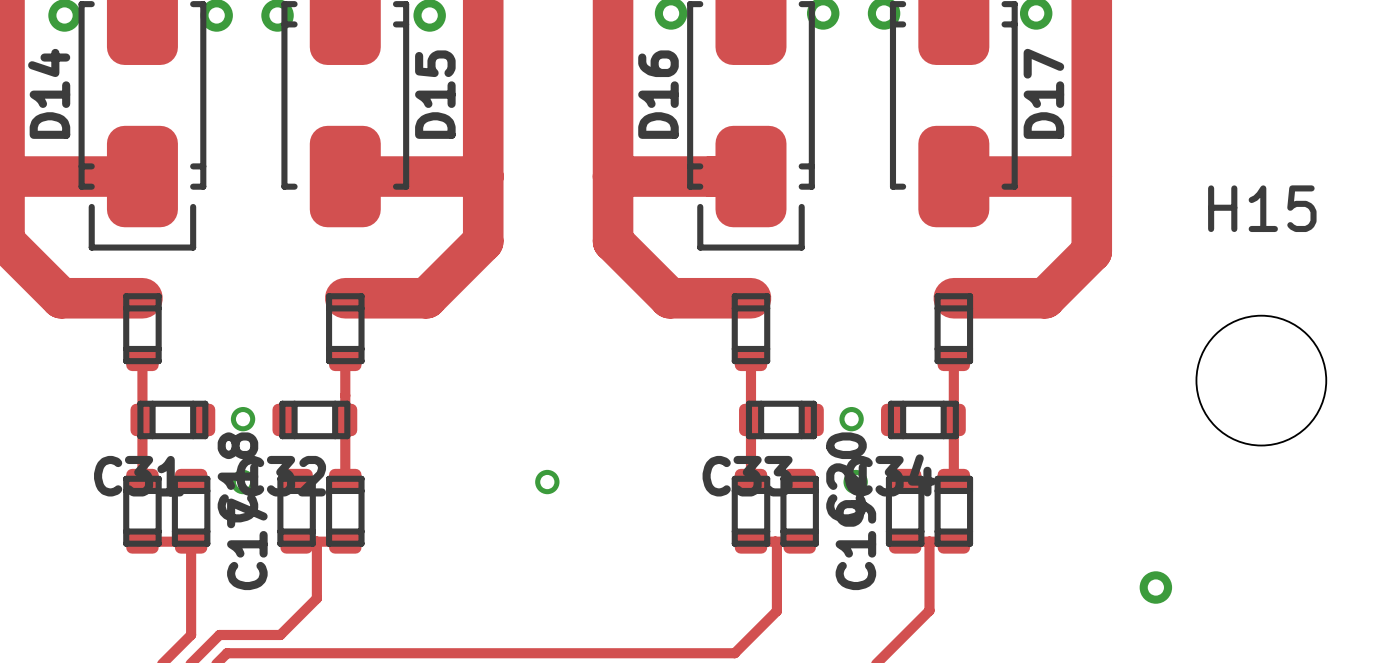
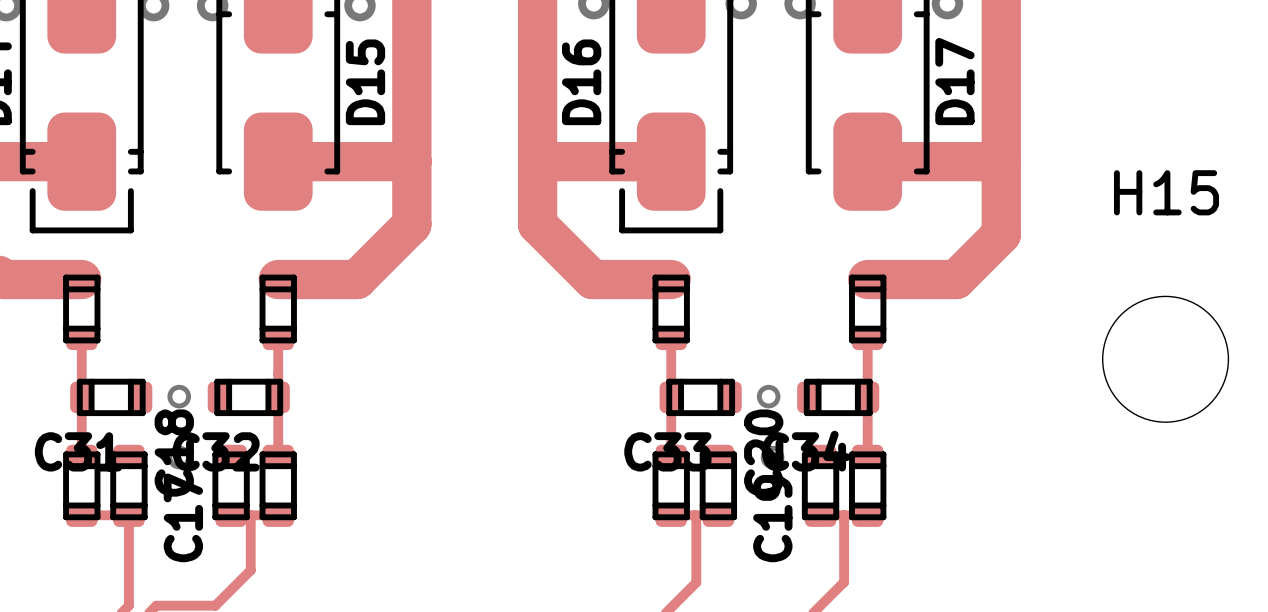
via: (547, 482) -> none
via: (1155, 587) -> none

